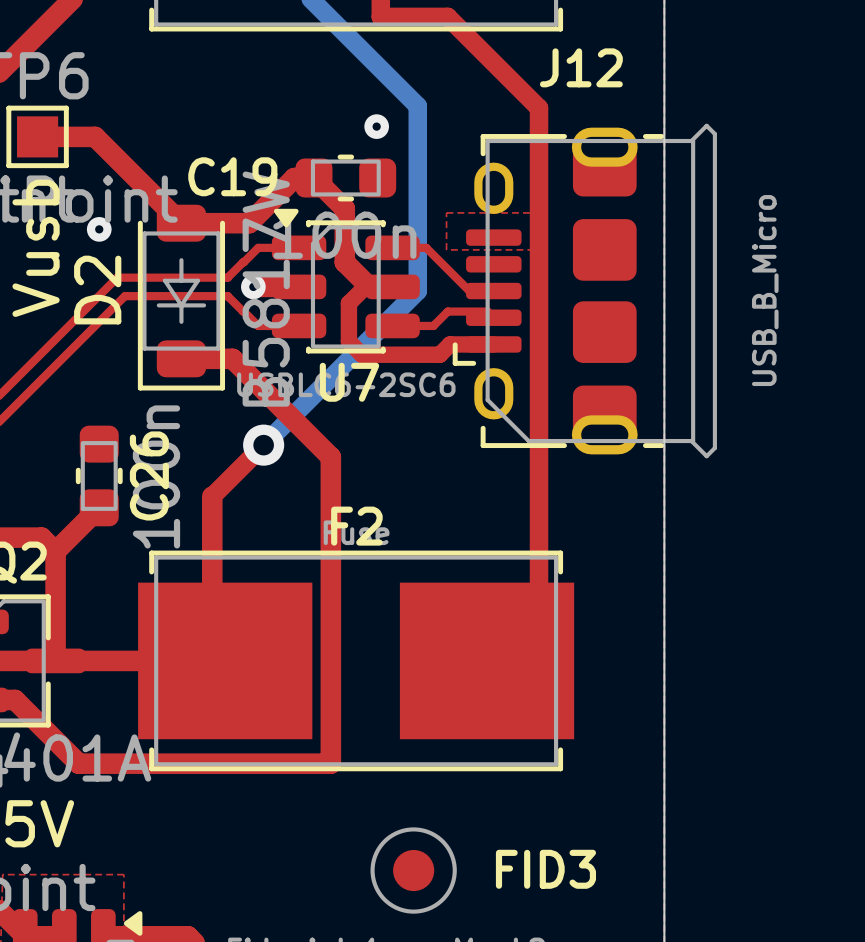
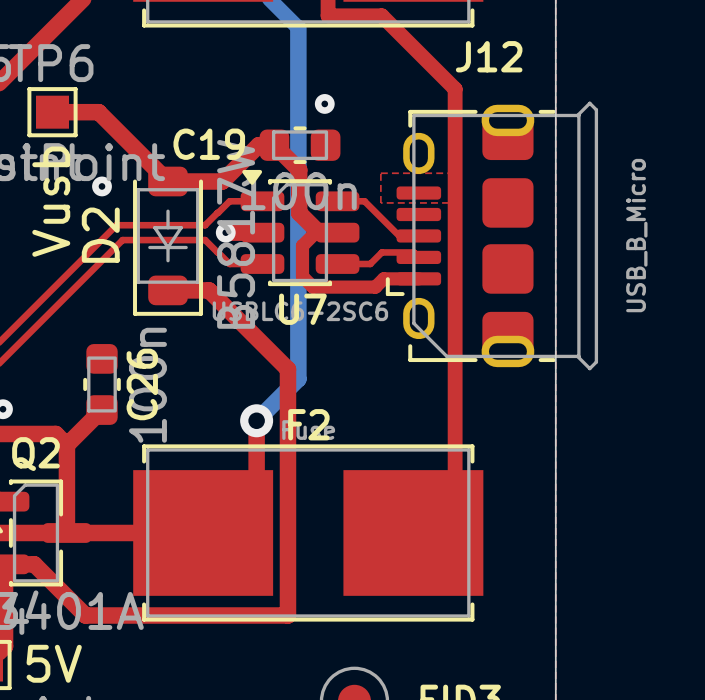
bottom track: (343, 32) (417, 106) (417, 291) (263, 445) -> (298, 28) (298, 379) (256, 420)
top track: (263, 445) (212, 496) (212, 647) -> none
via position: (263, 445) -> (256, 420)
top track: none -> (256, 420) (256, 479)

